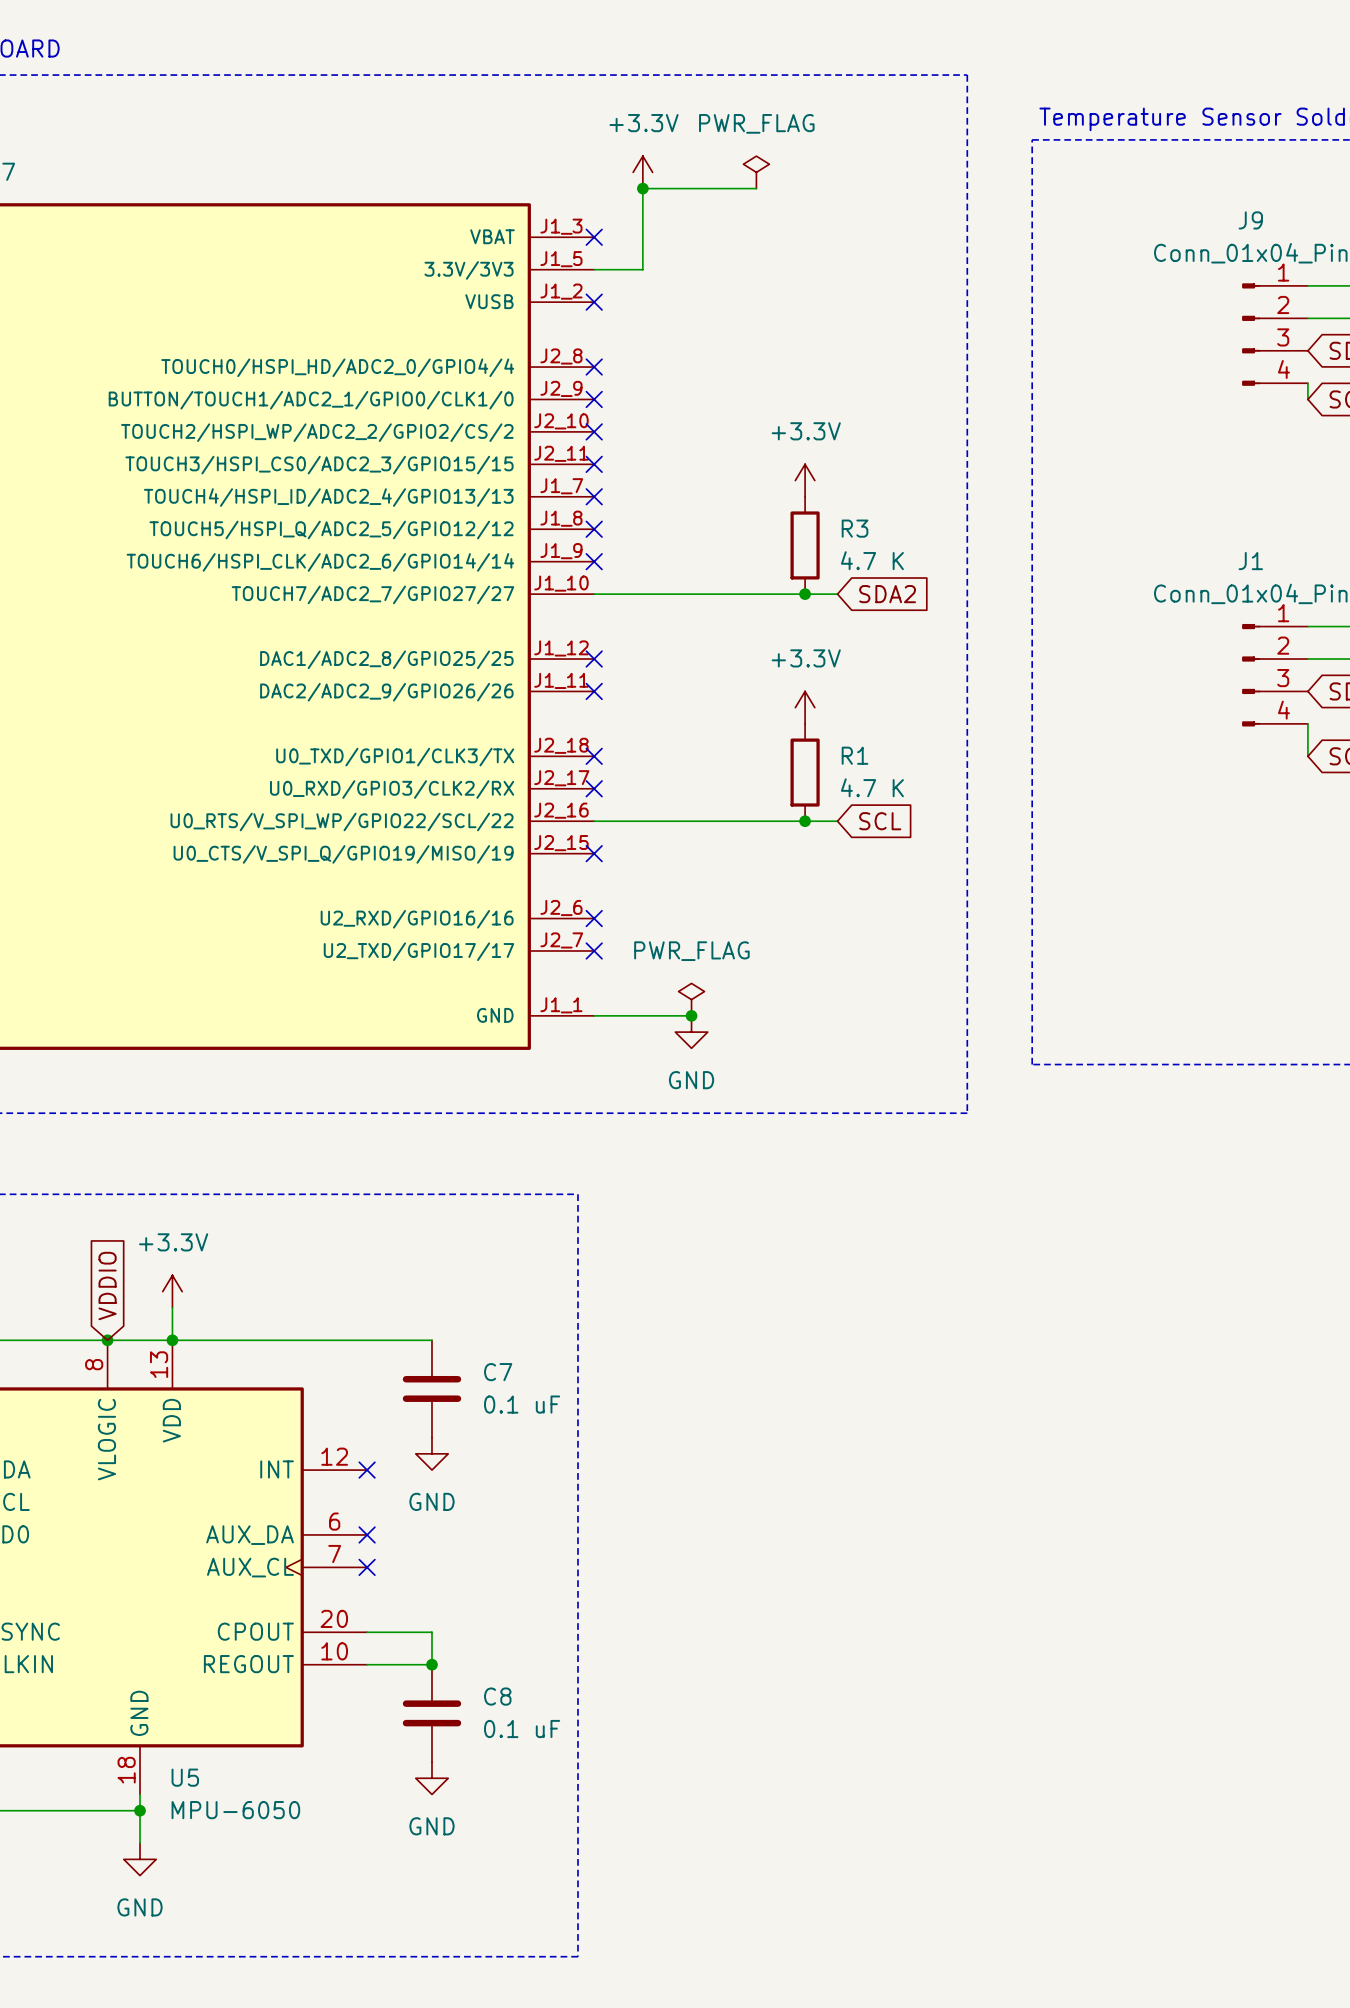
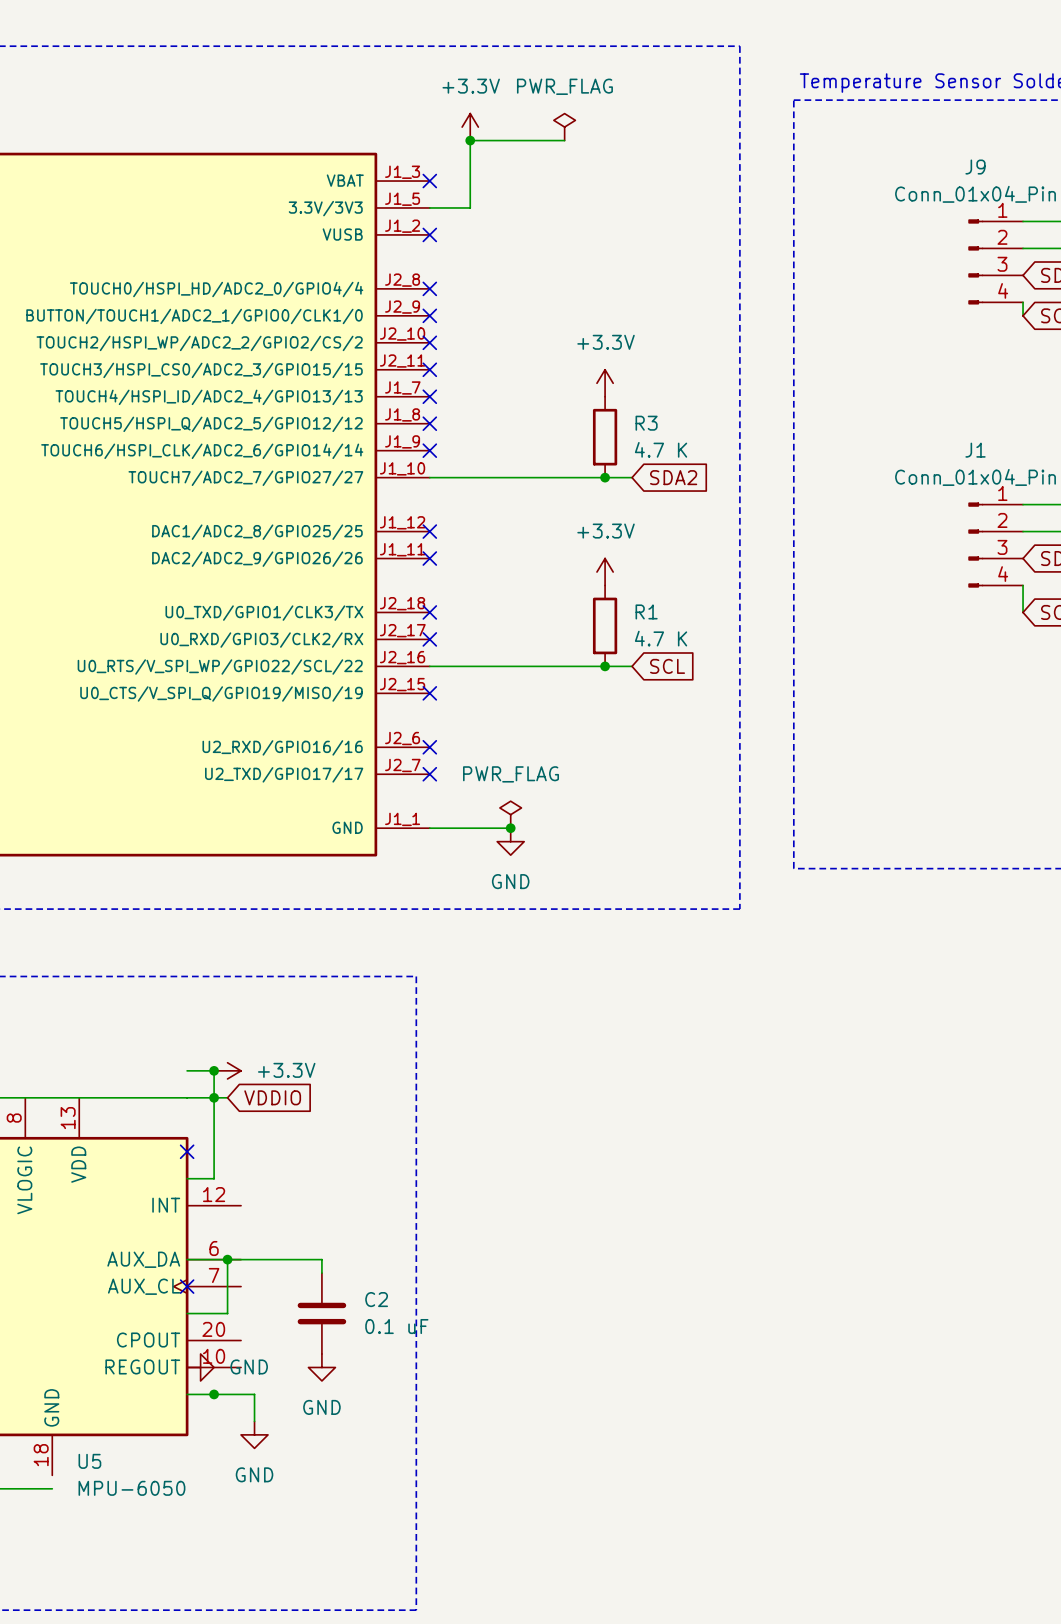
power symbol text position: +3.3V (173, 1242) -> +3.3V (286, 1070)
global label rotation: 0° (107, 1286) -> 90° clockwise (272, 1097)
global label position: VDDIO (107, 1286) -> VDDIO (272, 1097)
power symbol rotation: 0° (172, 1291) -> 90° clockwise (227, 1070)
power symbol position: +3.3V (172, 1291) -> +3.3V (227, 1070)
wire: (172, 1307) (172, 1340) -> none
wire: none -> (187, 1070) (214, 1070) (214, 1178) (187, 1178)
junction: none -> (214, 1070)
junction: (107, 1340) -> none
junction: (172, 1340) -> none
junction: none -> (214, 1097)
wire: (350, 1340) (431, 1340) -> none
C7: 0.1 uF (431, 1388) -> none
no-connect mark: none -> (187, 1151)
power symbol: GND (431, 1453) -> none
no-connect mark: (367, 1470) -> none
wire: none -> (187, 1259) (321, 1259) (321, 1273)
wire: none -> (227, 1259) (227, 1313) (187, 1313)
junction: none -> (227, 1259)
no-connect mark: (367, 1534) -> none
no-connect mark: none -> (187, 1286)
no-connect mark: (367, 1567) -> none
C2: none -> 0.1 uF (321, 1313)
wire: (367, 1632) (431, 1632) (431, 1664) (367, 1664) -> none
power symbol: none -> GND (200, 1367)
junction: (431, 1664) -> none
power symbol: none -> GND (321, 1367)
wire: none -> (187, 1394) (254, 1394) (254, 1421)
junction: none -> (214, 1394)
C8: 0.1 uF (431, 1713) -> none
power symbol position: GND (431, 1778) -> GND (254, 1434)
wire: (140, 1794) (140, 1843) -> none
junction: (140, 1810) -> none
power symbol: GND (140, 1859) -> none

